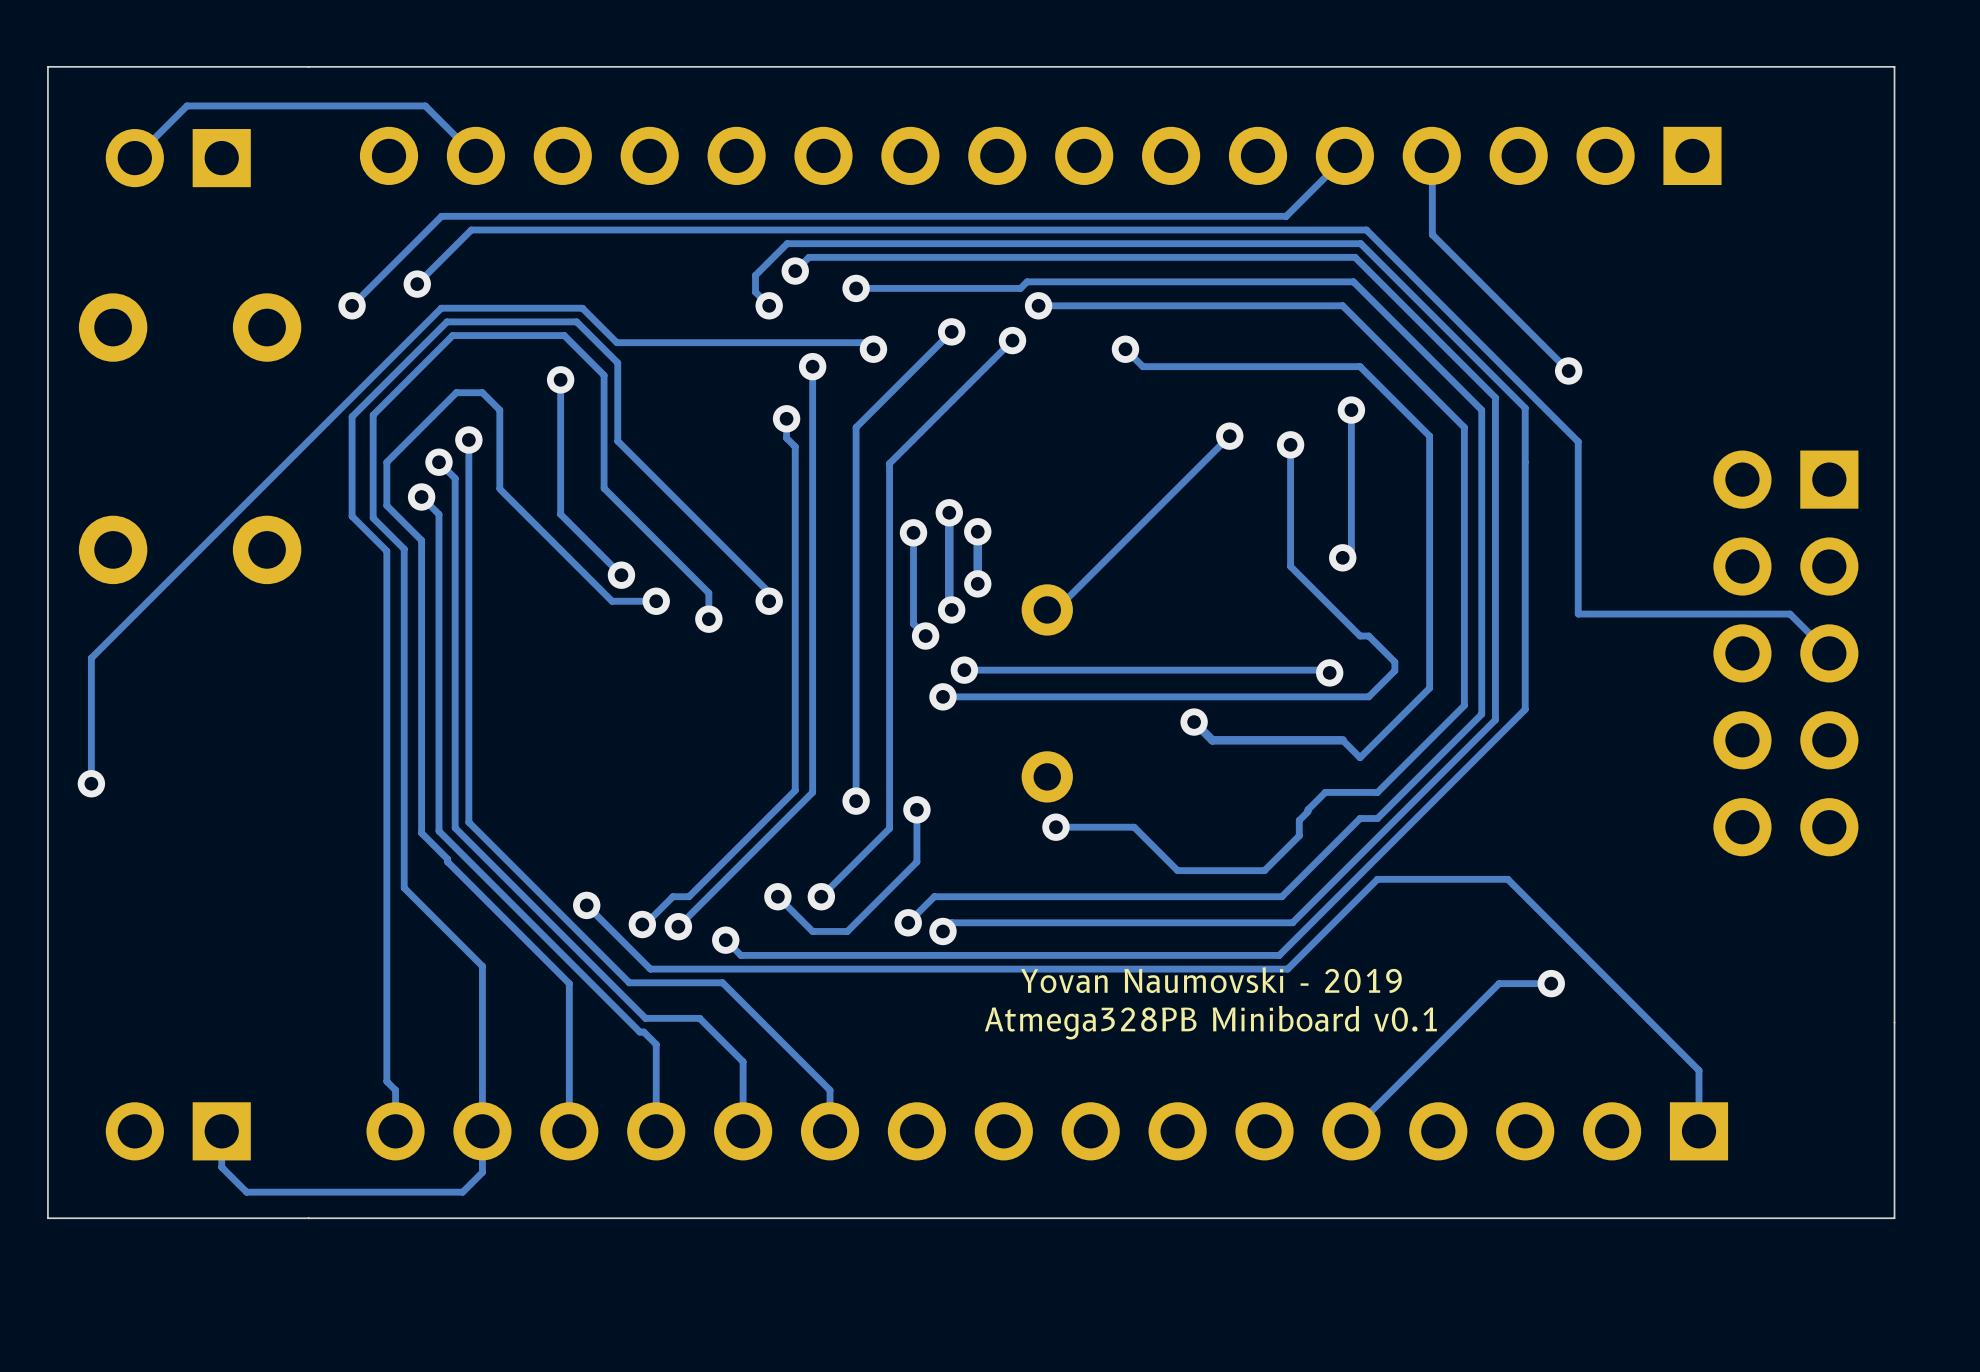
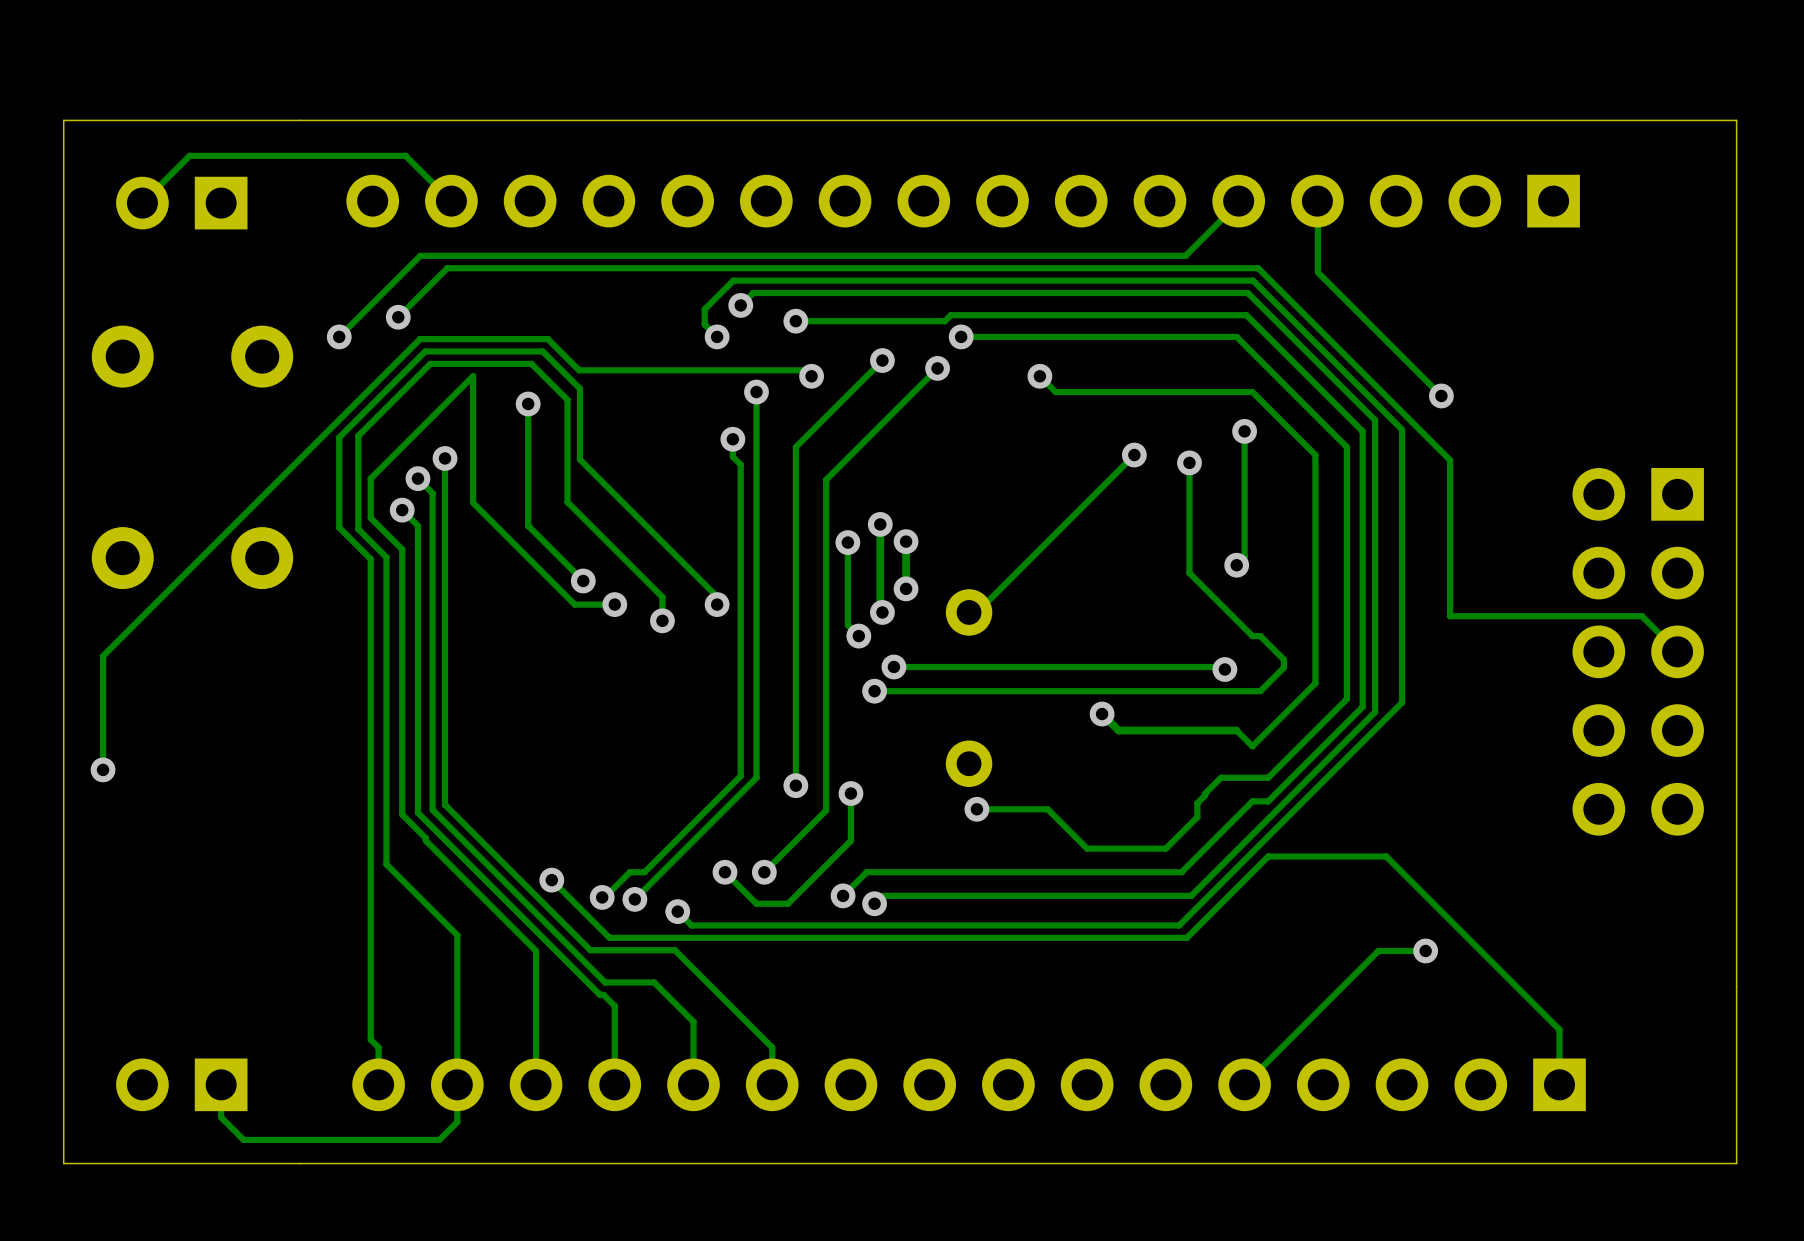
track: (456, 392) (482, 392) (499, 410) -> (433, 415) (473, 376) (473, 431)
text: Yovan Naumovski - 2019 (1211, 980) -> none
text: Atmega328PB Miniboard v0.1 (1210, 1022) -> none

